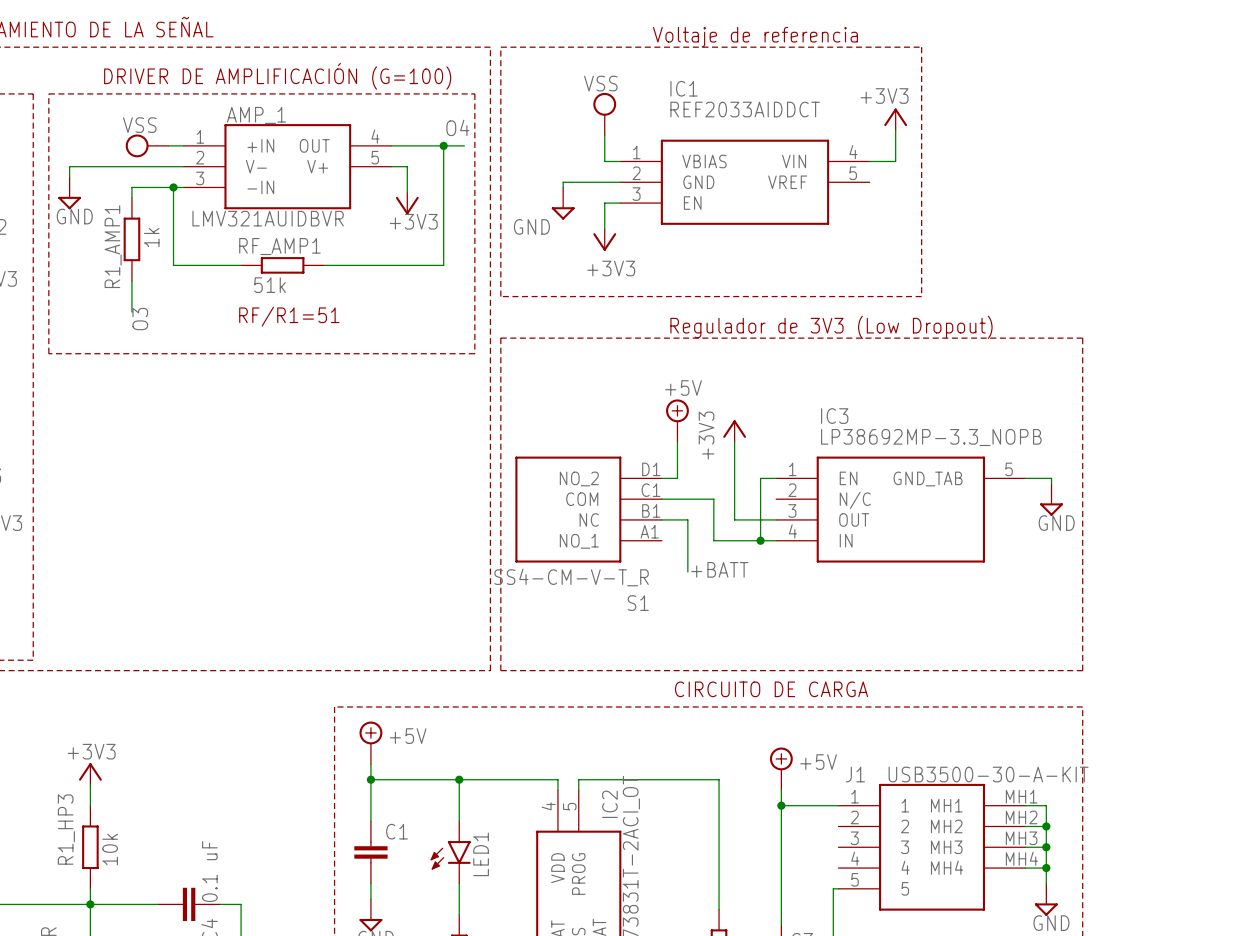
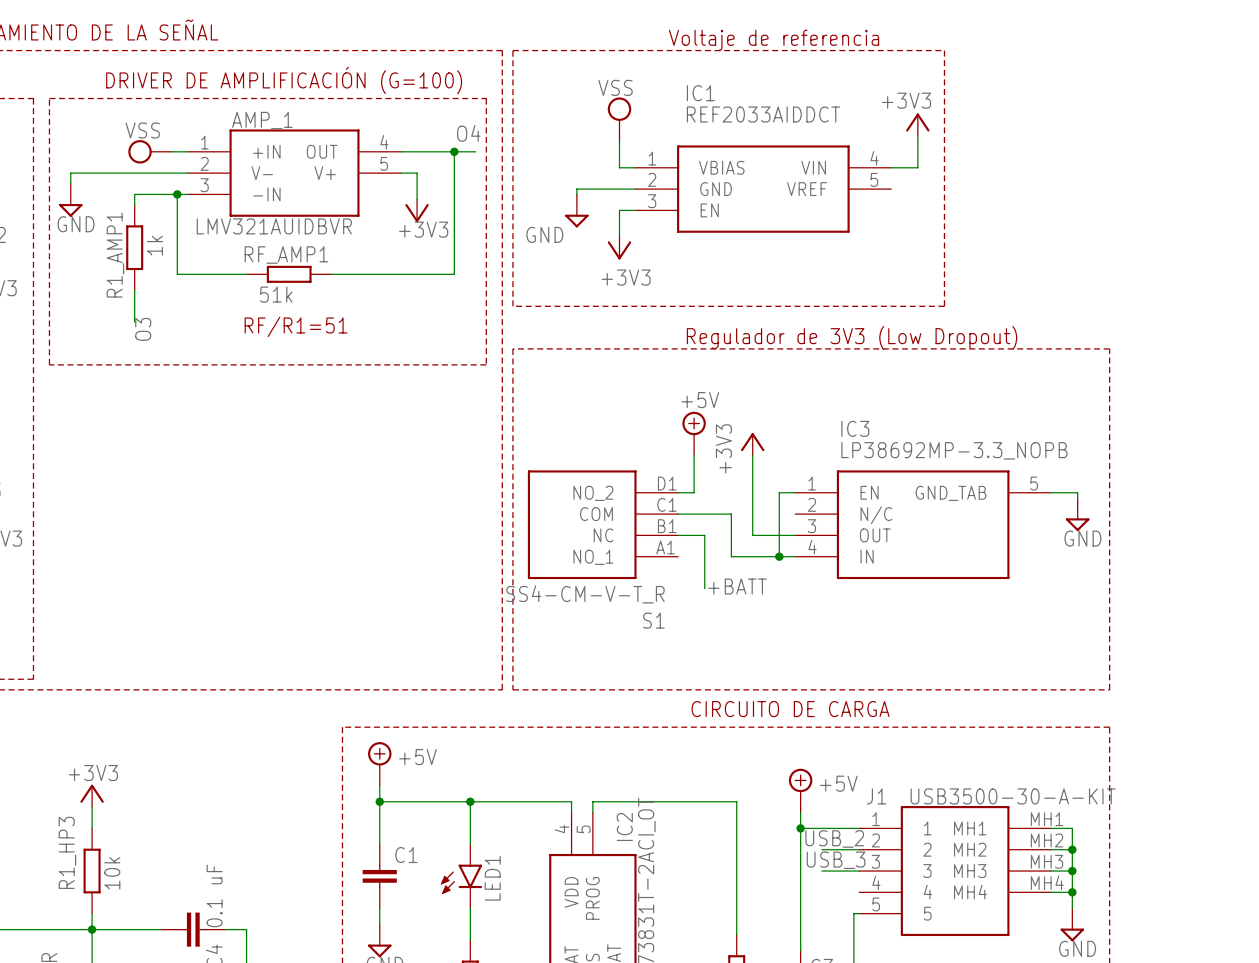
label: none -> USB_2 (834, 838)
wire: none -> (821, 849) (859, 849)
label: none -> USB_3 (836, 860)
wire: none -> (821, 871) (859, 871)

